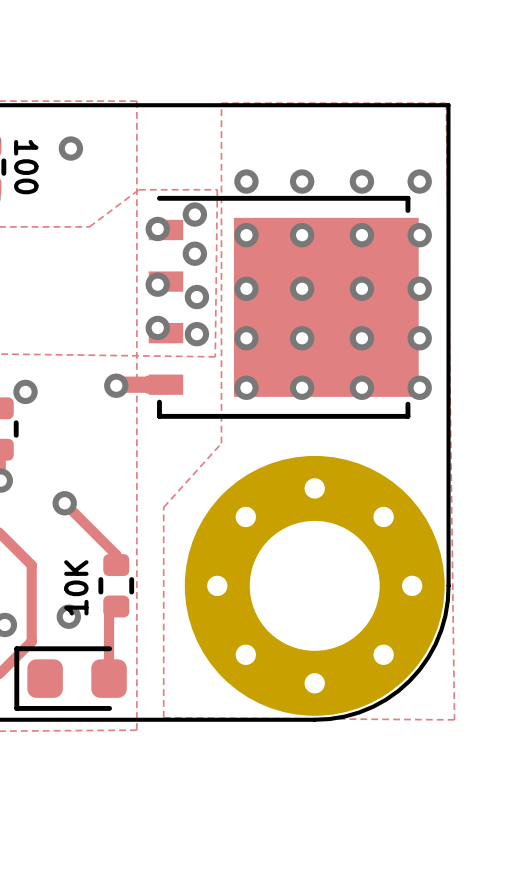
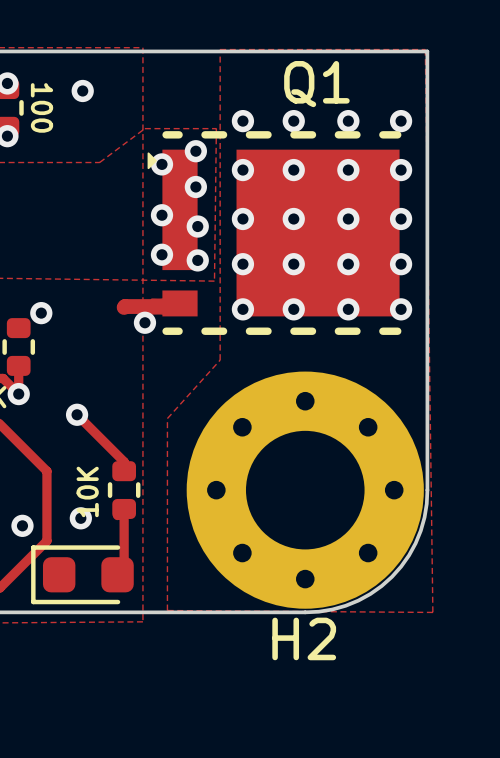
Q1: none -> (274, 233)
part: (283, 307) -> none
via position: (116, 385) -> (144, 322)
track: (109, 613) (109, 678) -> none
track: none -> (124, 519) (123, 572)
H2 name: none -> H2 (304, 638)

